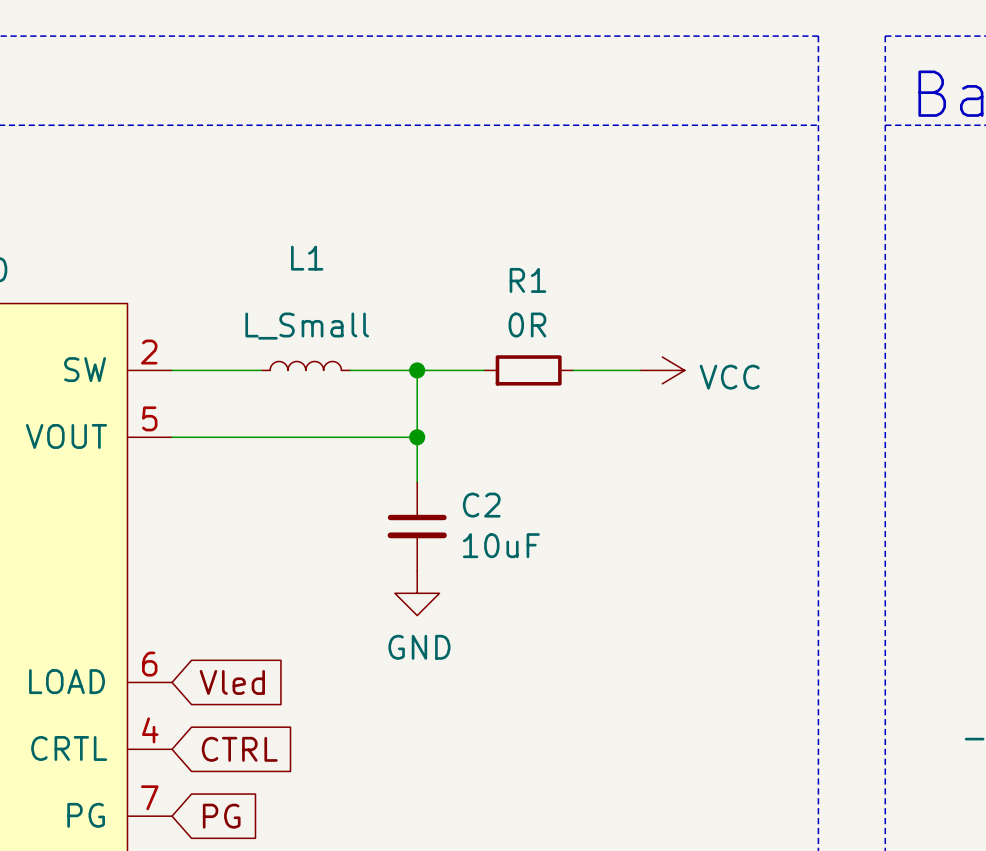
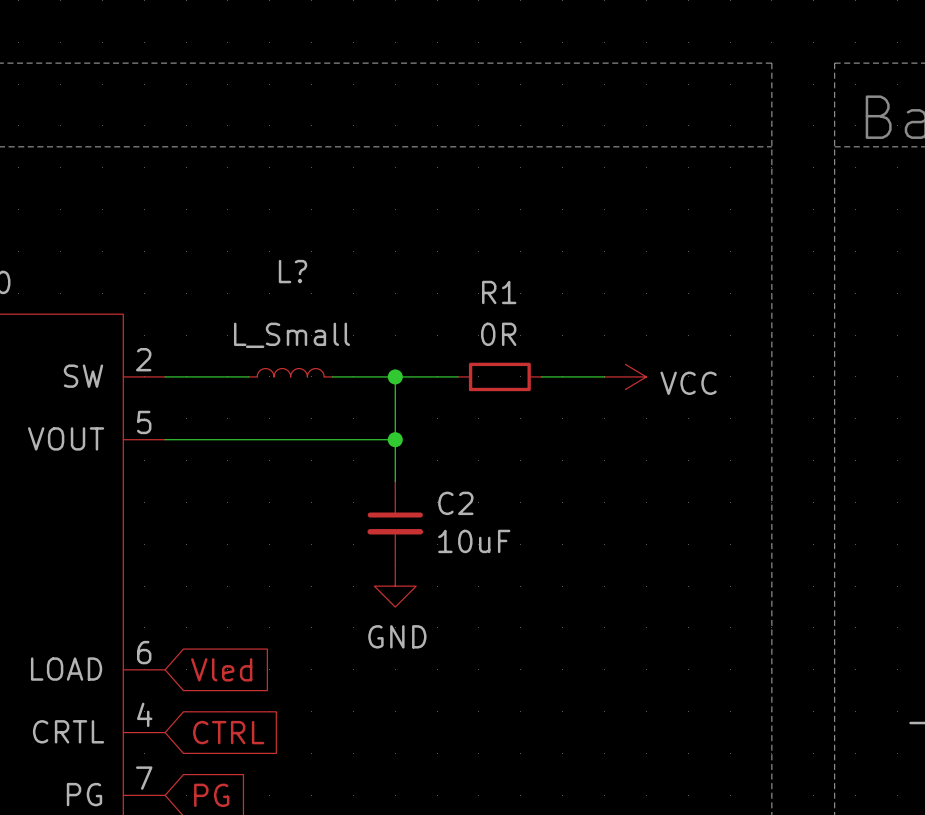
L1 name: L1 (307, 258) -> L? (293, 271)

